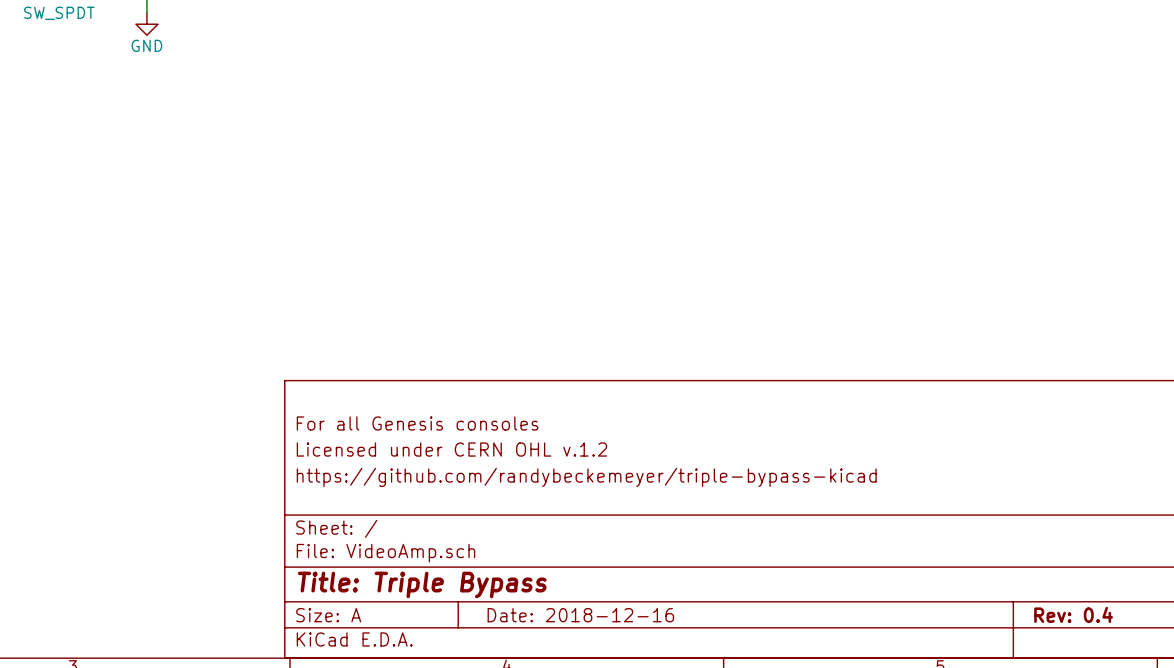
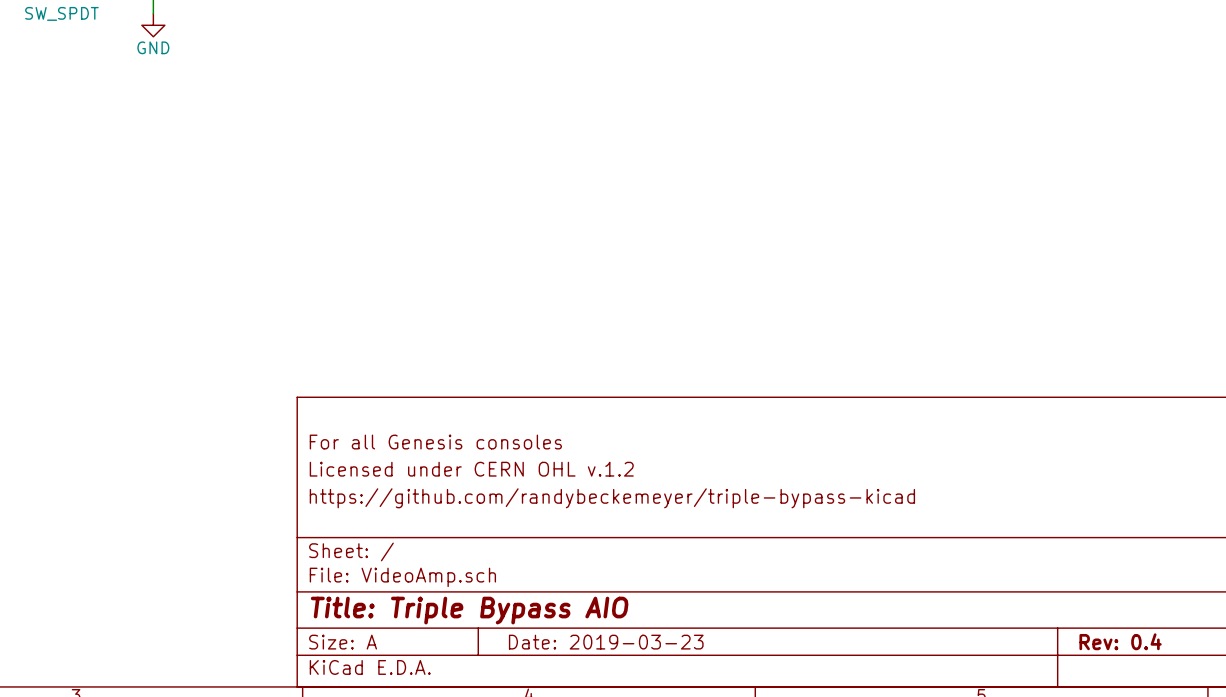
title block: Title: Triple Bypass (422, 584) -> Title: Triple Bypass AIO (469, 610)
title block: Date: 2018-12-16 (580, 615) -> Date: 2019-03-23 (606, 642)

